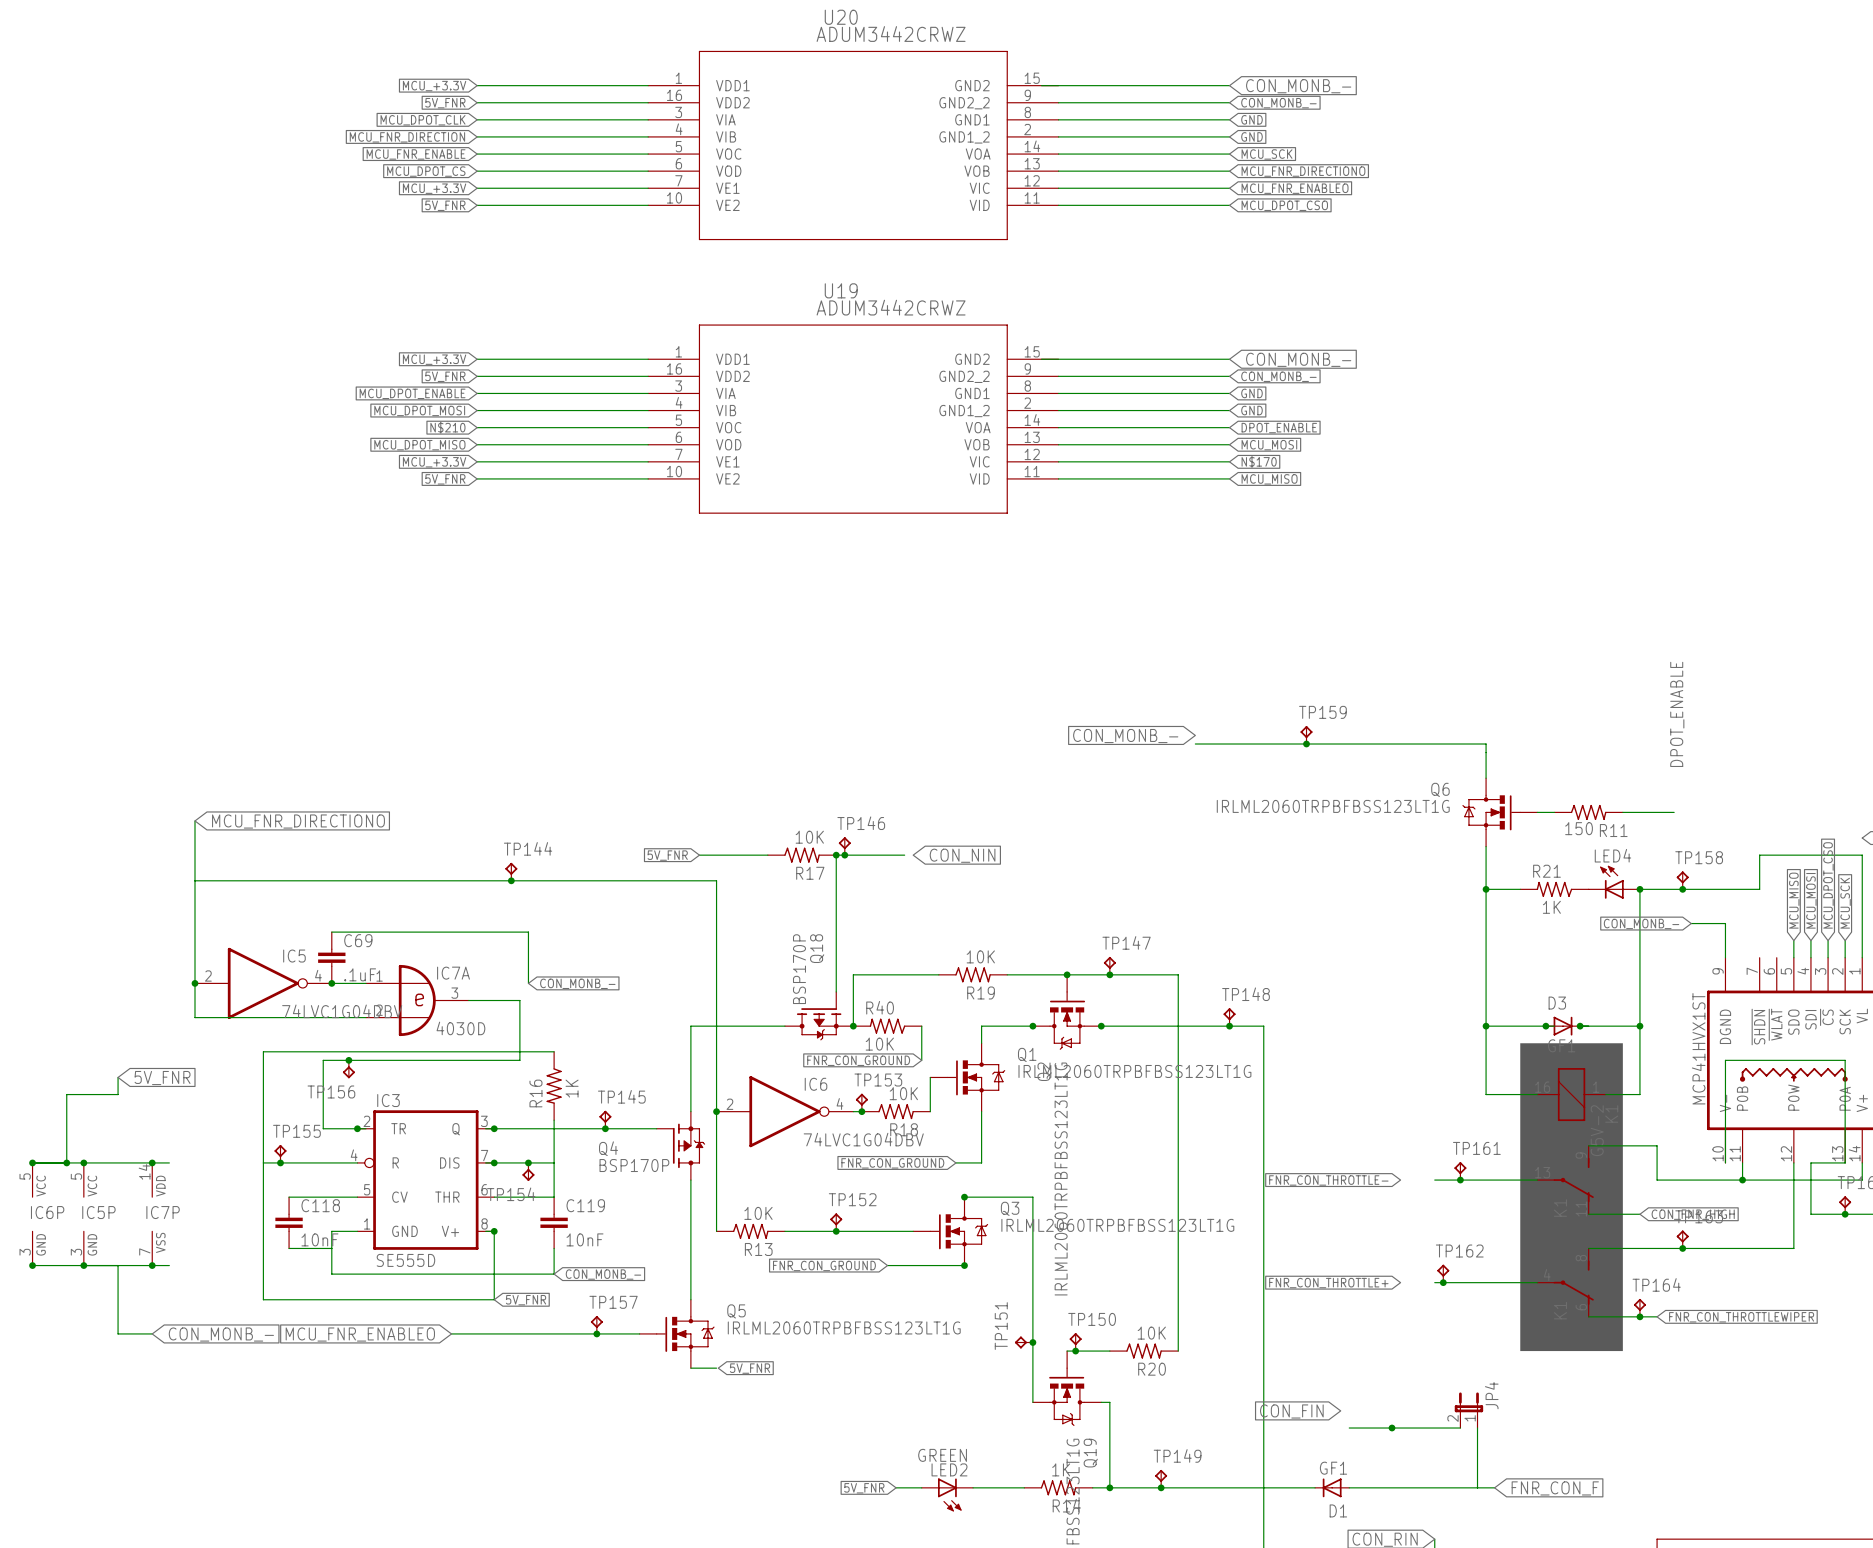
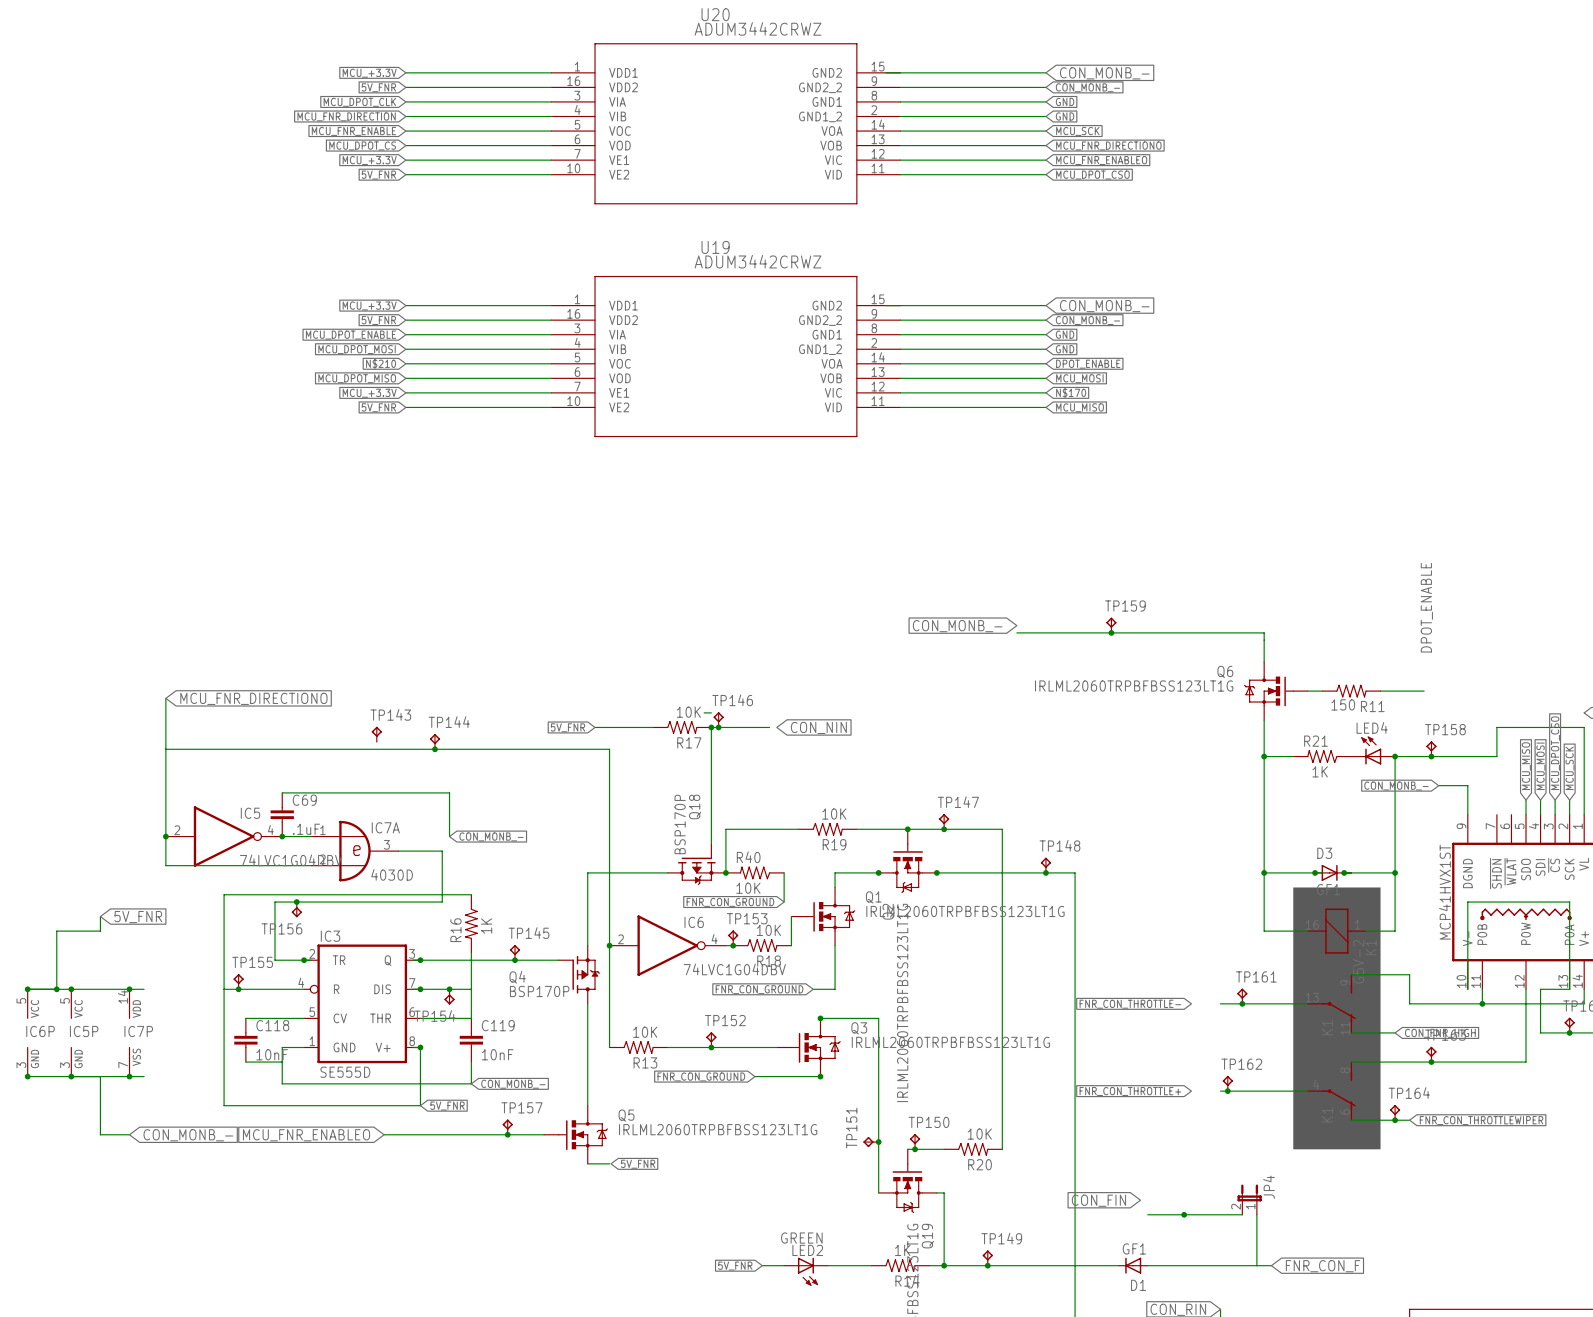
wire: none -> (704, 712) (711, 712)
TP143: none -> (376, 734)

